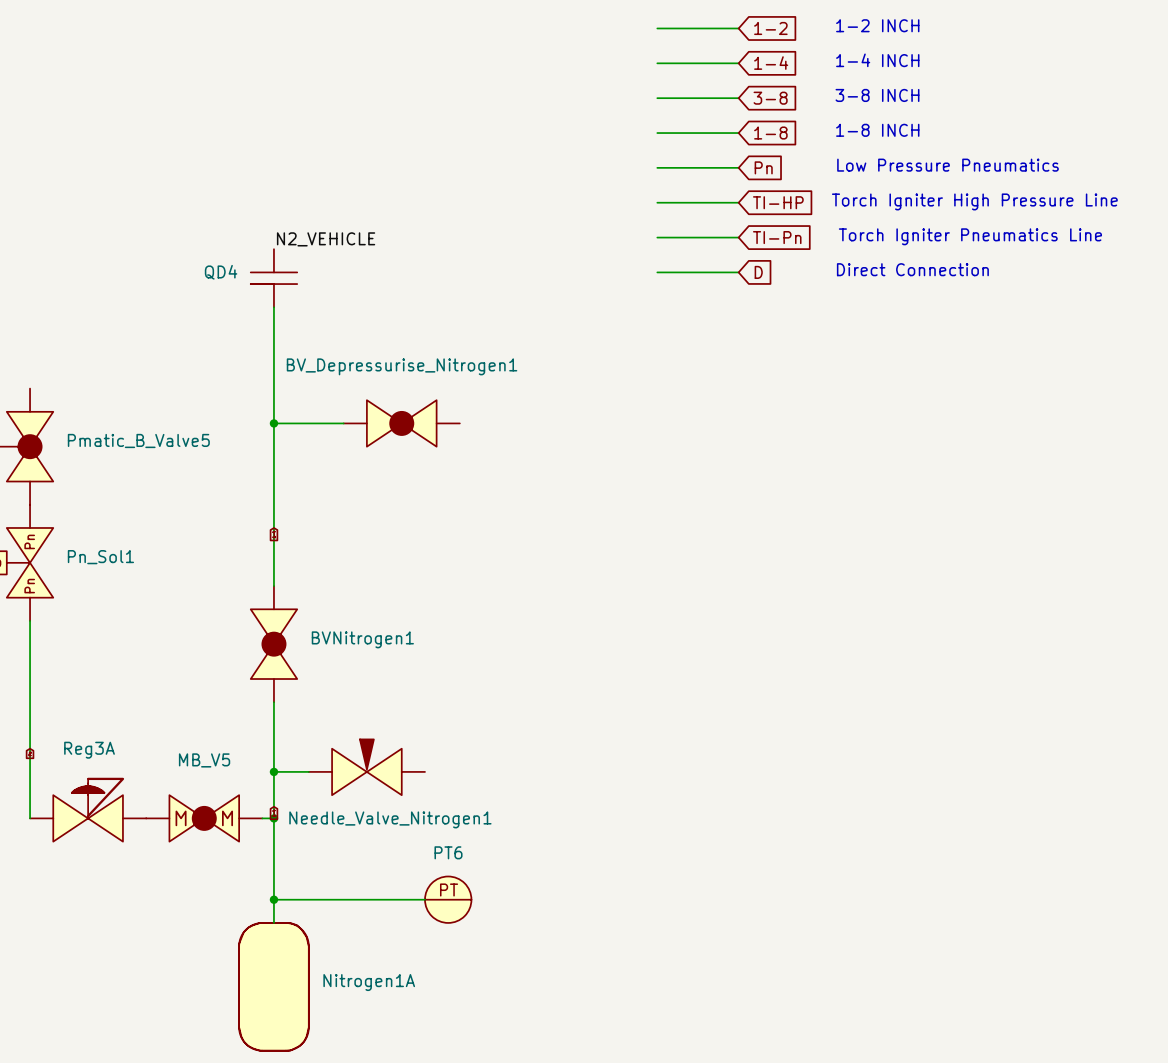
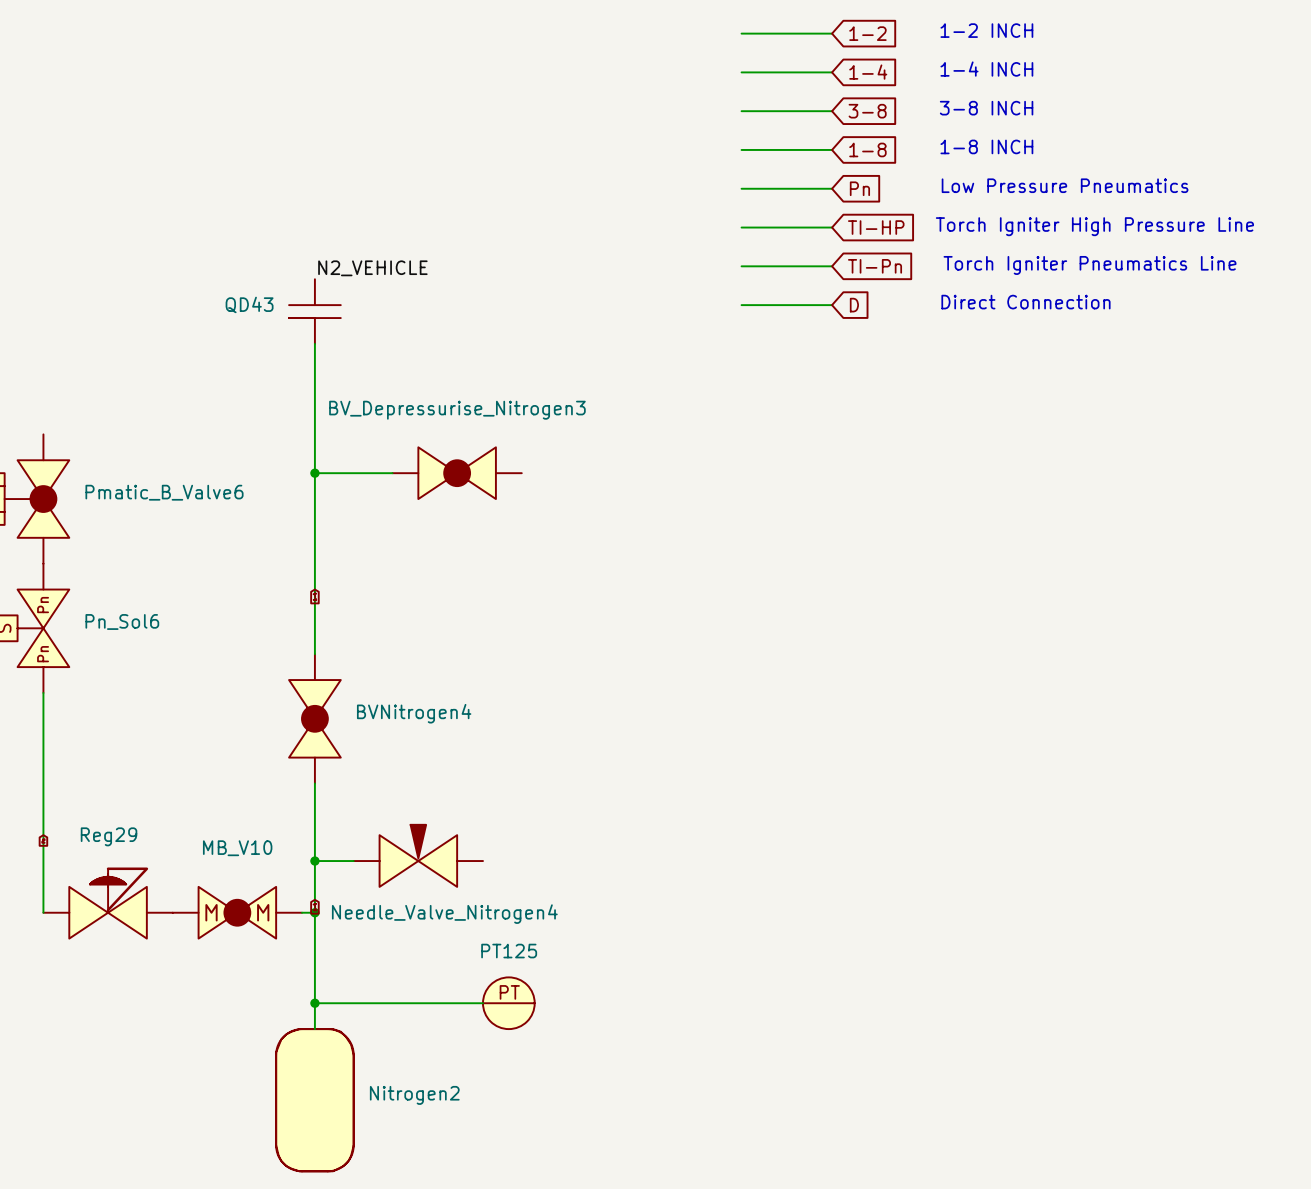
QD4 name: QD4 (221, 272) -> QD43 (249, 304)
BV_Depressurise_Nitrogen1 name: BV_Depressurise_Nitrogen1 (402, 366) -> BV_Depressurise_Nitrogen3 (457, 410)
Pmatic_B_Valve5 name: Pmatic_B_Valve5 (138, 440) -> Pmatic_B_Valve6 (164, 492)
Pn_Sol1 name: Pn_Sol1 (100, 557) -> Pn_Sol6 (122, 621)
BVNitrogen1 name: BVNitrogen1 (362, 639) -> BVNitrogen4 (414, 713)
Reg3A name: Reg3A (89, 750) -> Reg29 (109, 836)
MB_V5 name: MB_V5 (204, 760) -> MB_V10 (237, 848)
Needle_Valve_Nitrogen1 name: Needle_Valve_Nitrogen1 (390, 819) -> Needle_Valve_Nitrogen4 (444, 914)
PT6 name: PT6 (448, 852) -> PT125 (509, 951)
Nitrogen1A: (273, 986) -> none
Nitrogen2: none -> (314, 1100)

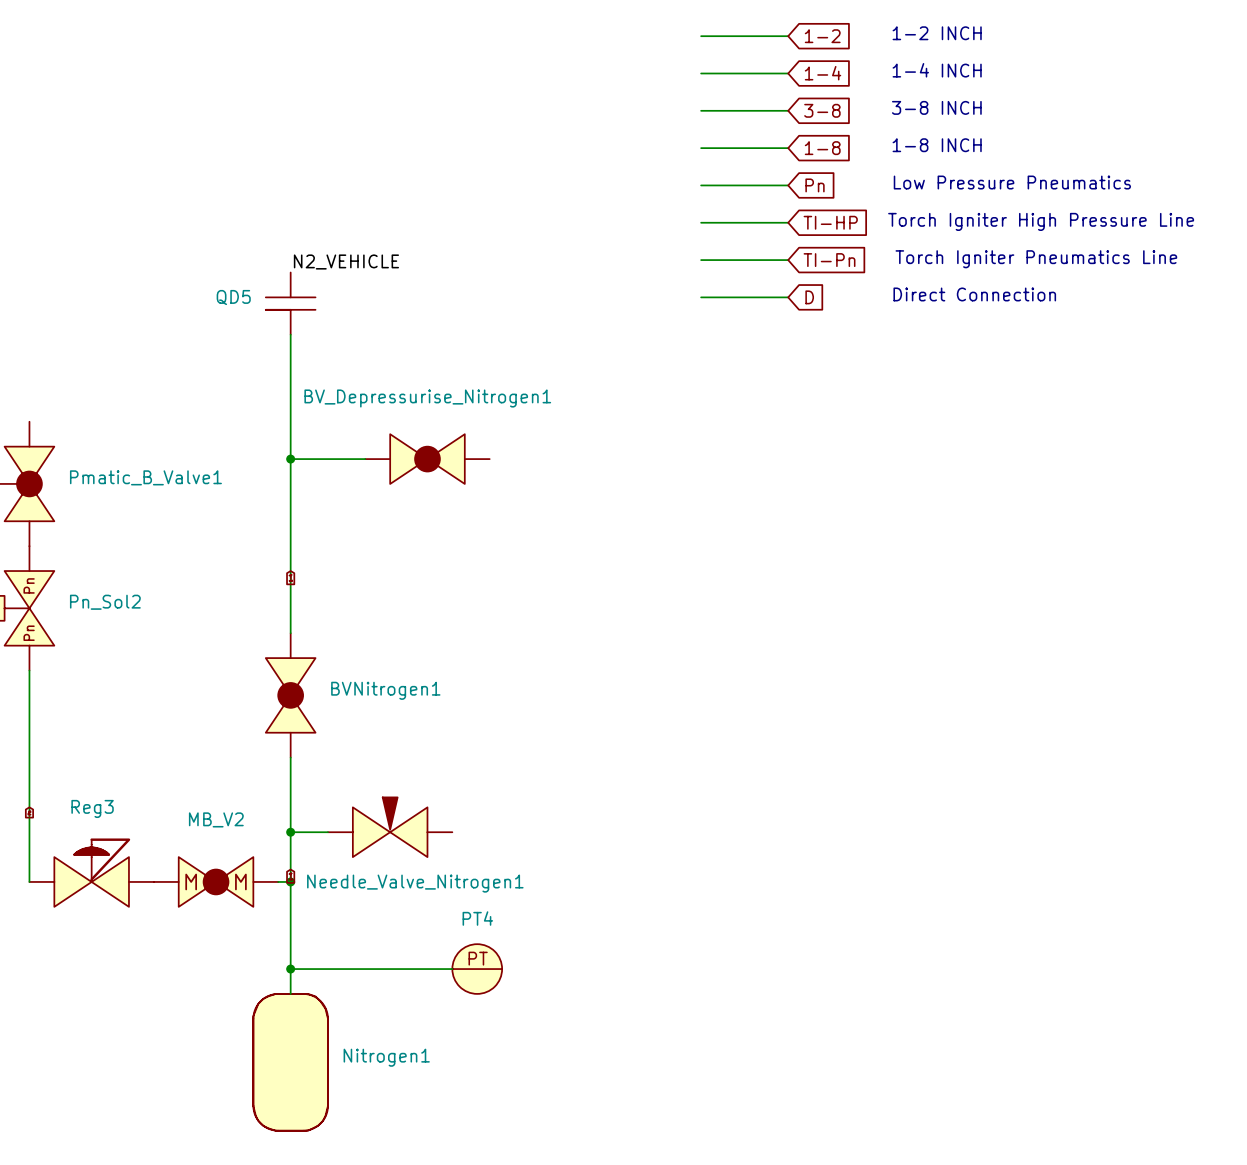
QD43 name: QD43 (249, 304) -> QD5 (233, 297)
BV_Depressurise_Nitrogen3 name: BV_Depressurise_Nitrogen3 (457, 410) -> BV_Depressurise_Nitrogen1 (427, 398)
Pmatic_B_Valve6 name: Pmatic_B_Valve6 (164, 492) -> Pmatic_B_Valve1 (145, 477)
Pn_Sol6 name: Pn_Sol6 (122, 621) -> Pn_Sol2 (105, 602)
BVNitrogen4 name: BVNitrogen4 (414, 713) -> BVNitrogen1 (385, 690)
Reg29 name: Reg29 (109, 836) -> Reg3 (92, 808)
MB_V10 name: MB_V10 (237, 848) -> MB_V2 (216, 819)
Needle_Valve_Nitrogen4 name: Needle_Valve_Nitrogen4 (444, 914) -> Needle_Valve_Nitrogen1 (415, 883)
PT125 name: PT125 (509, 951) -> PT4 (477, 918)
Nitrogen2 name: Nitrogen2 (414, 1095) -> Nitrogen1 (386, 1057)

